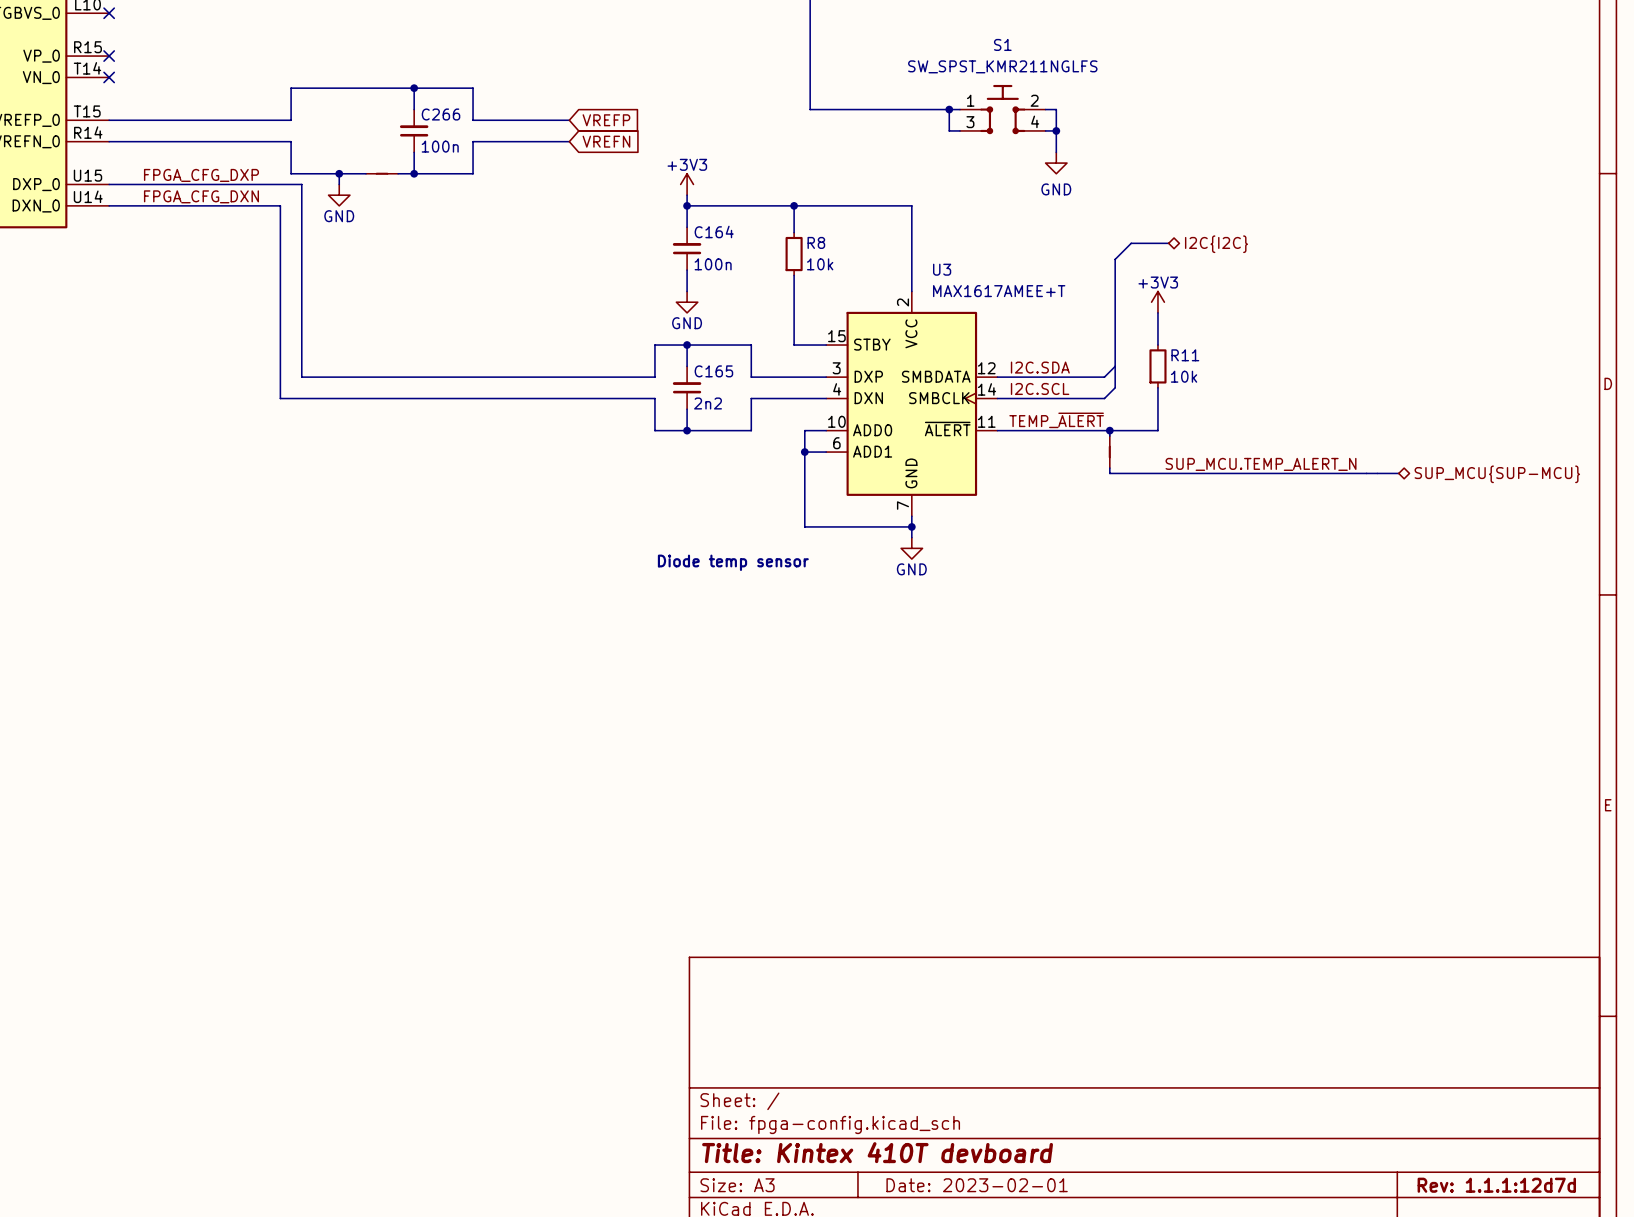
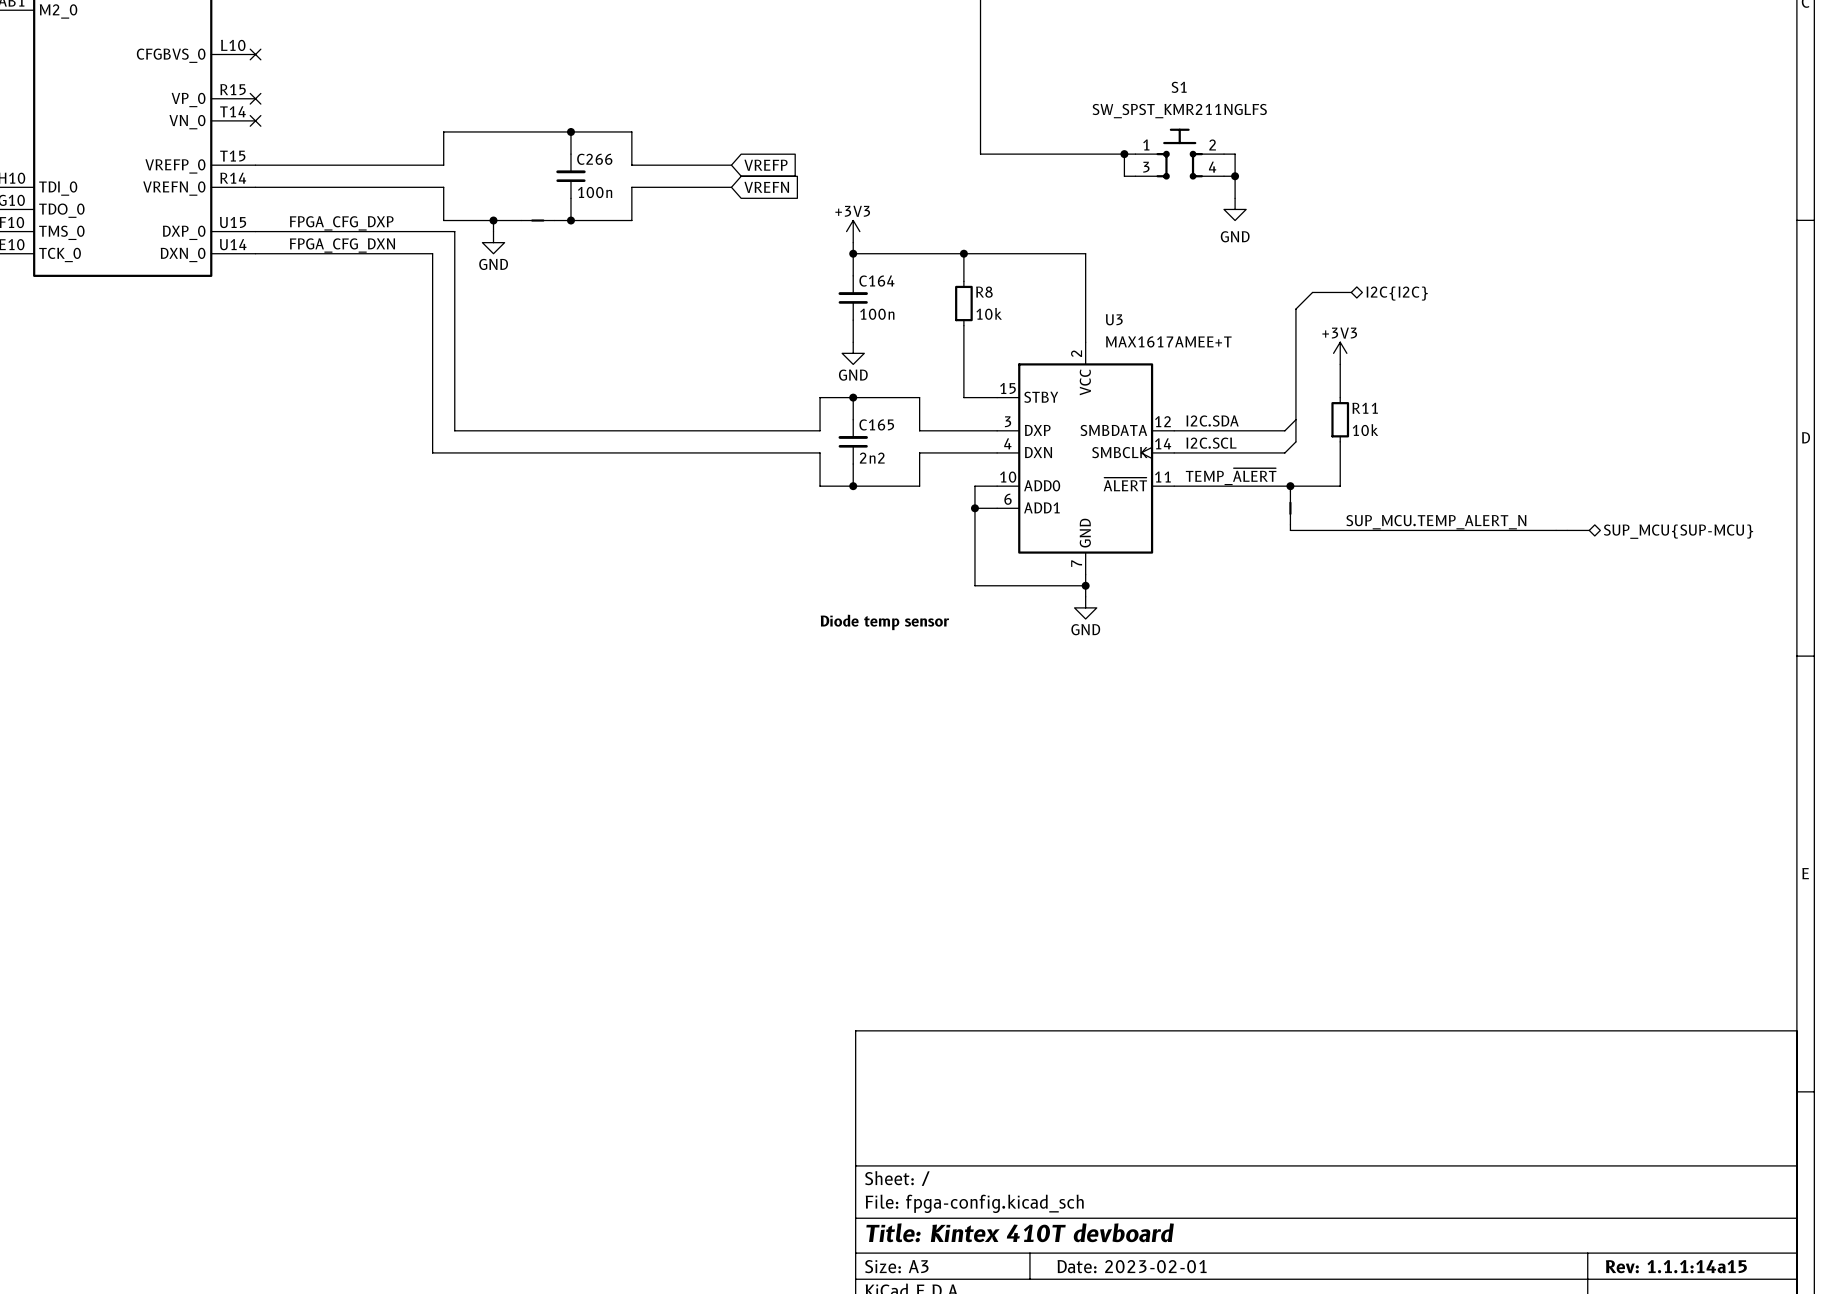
title block: Rev: 1.1.1:12d7d (1496, 1185) -> Rev: 1.1.1:14a15 (1676, 1266)

